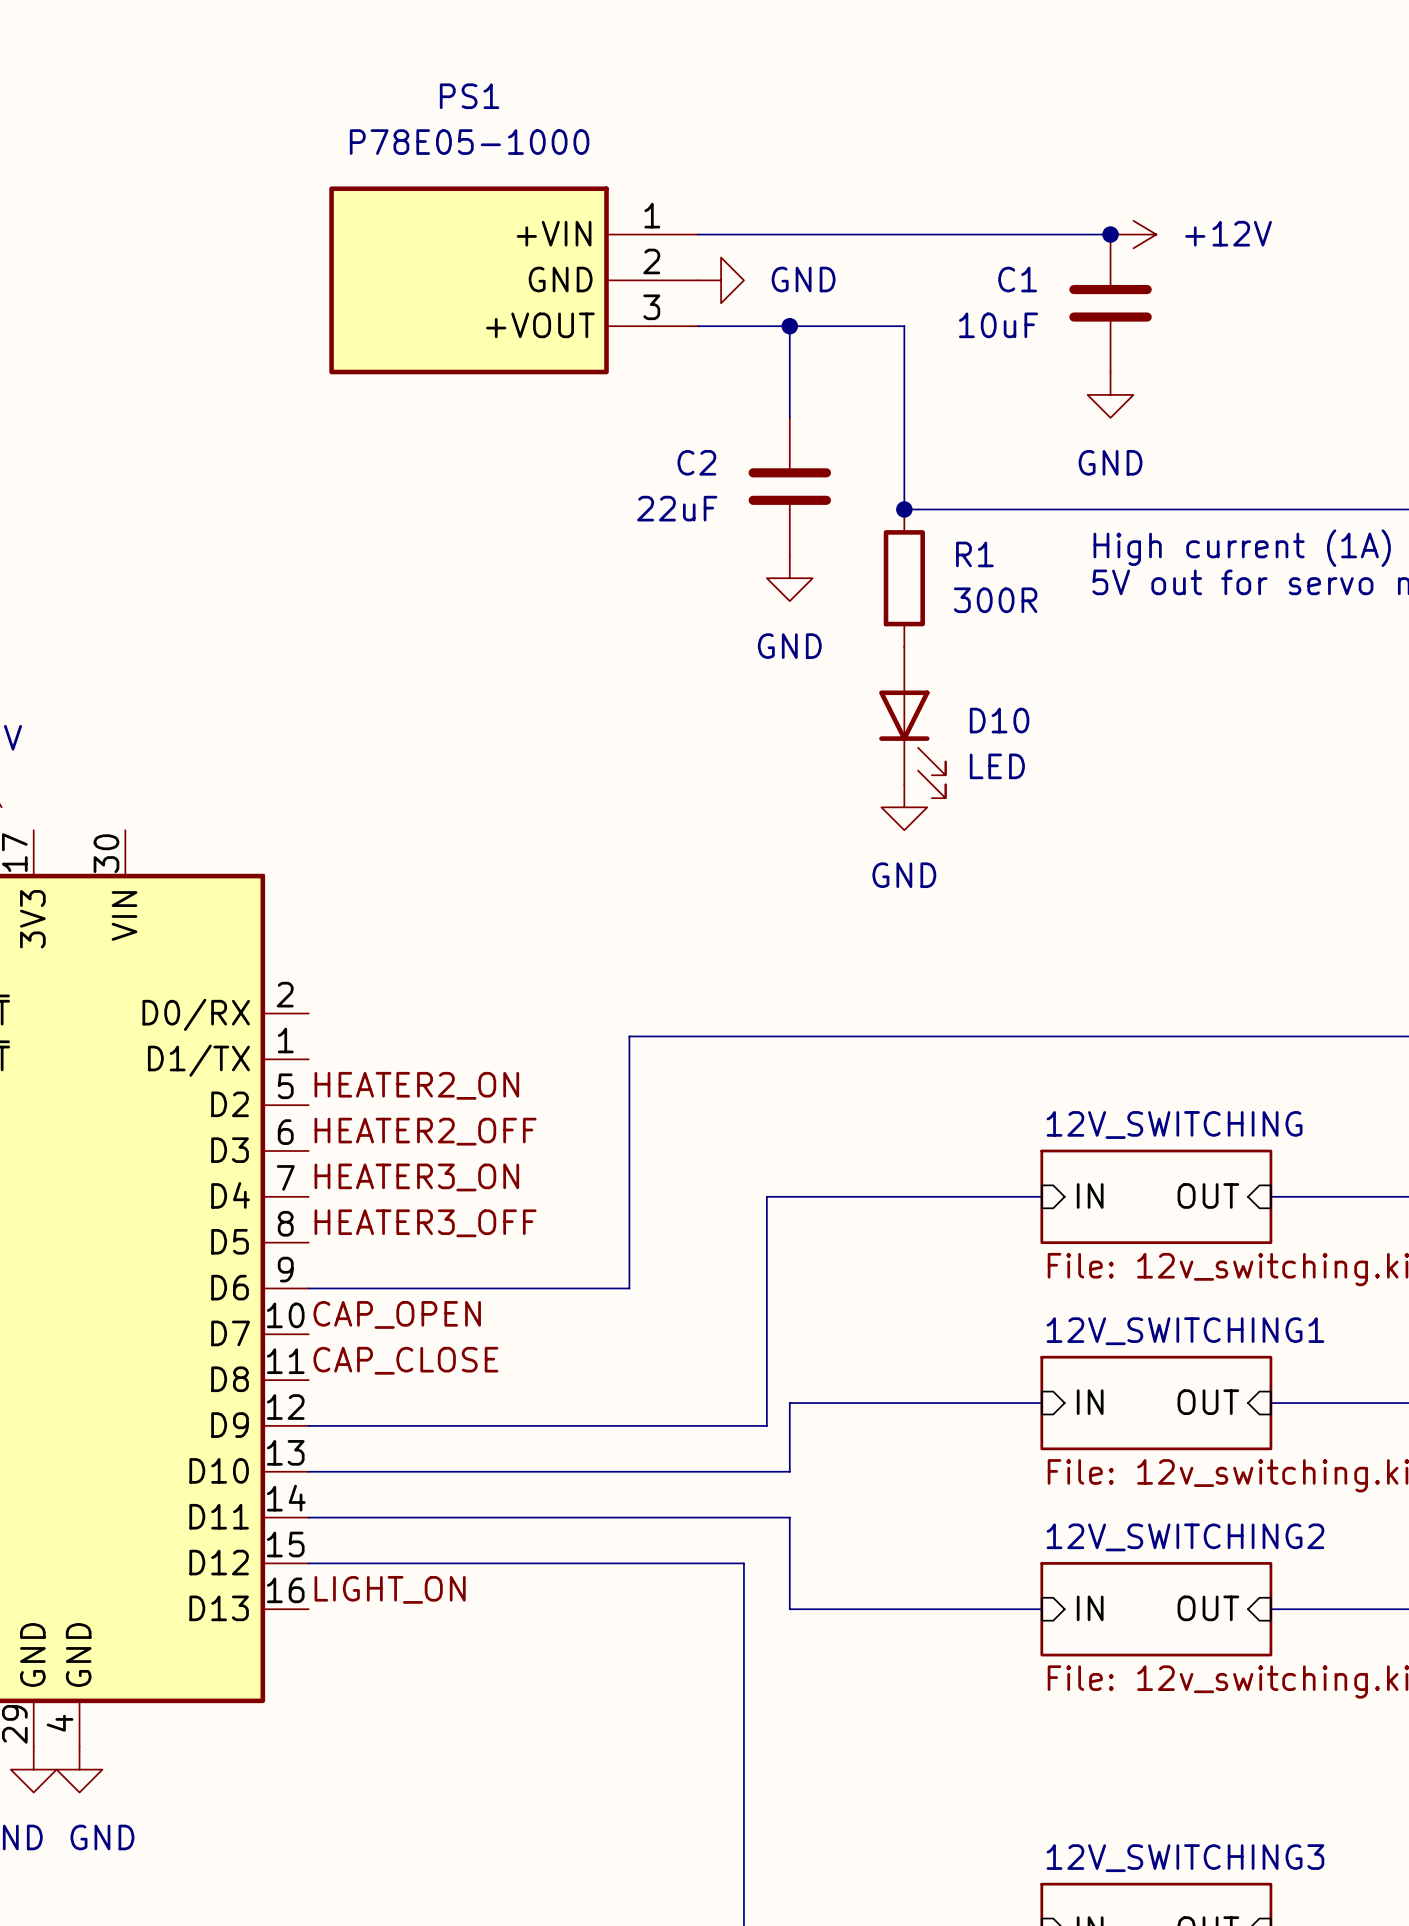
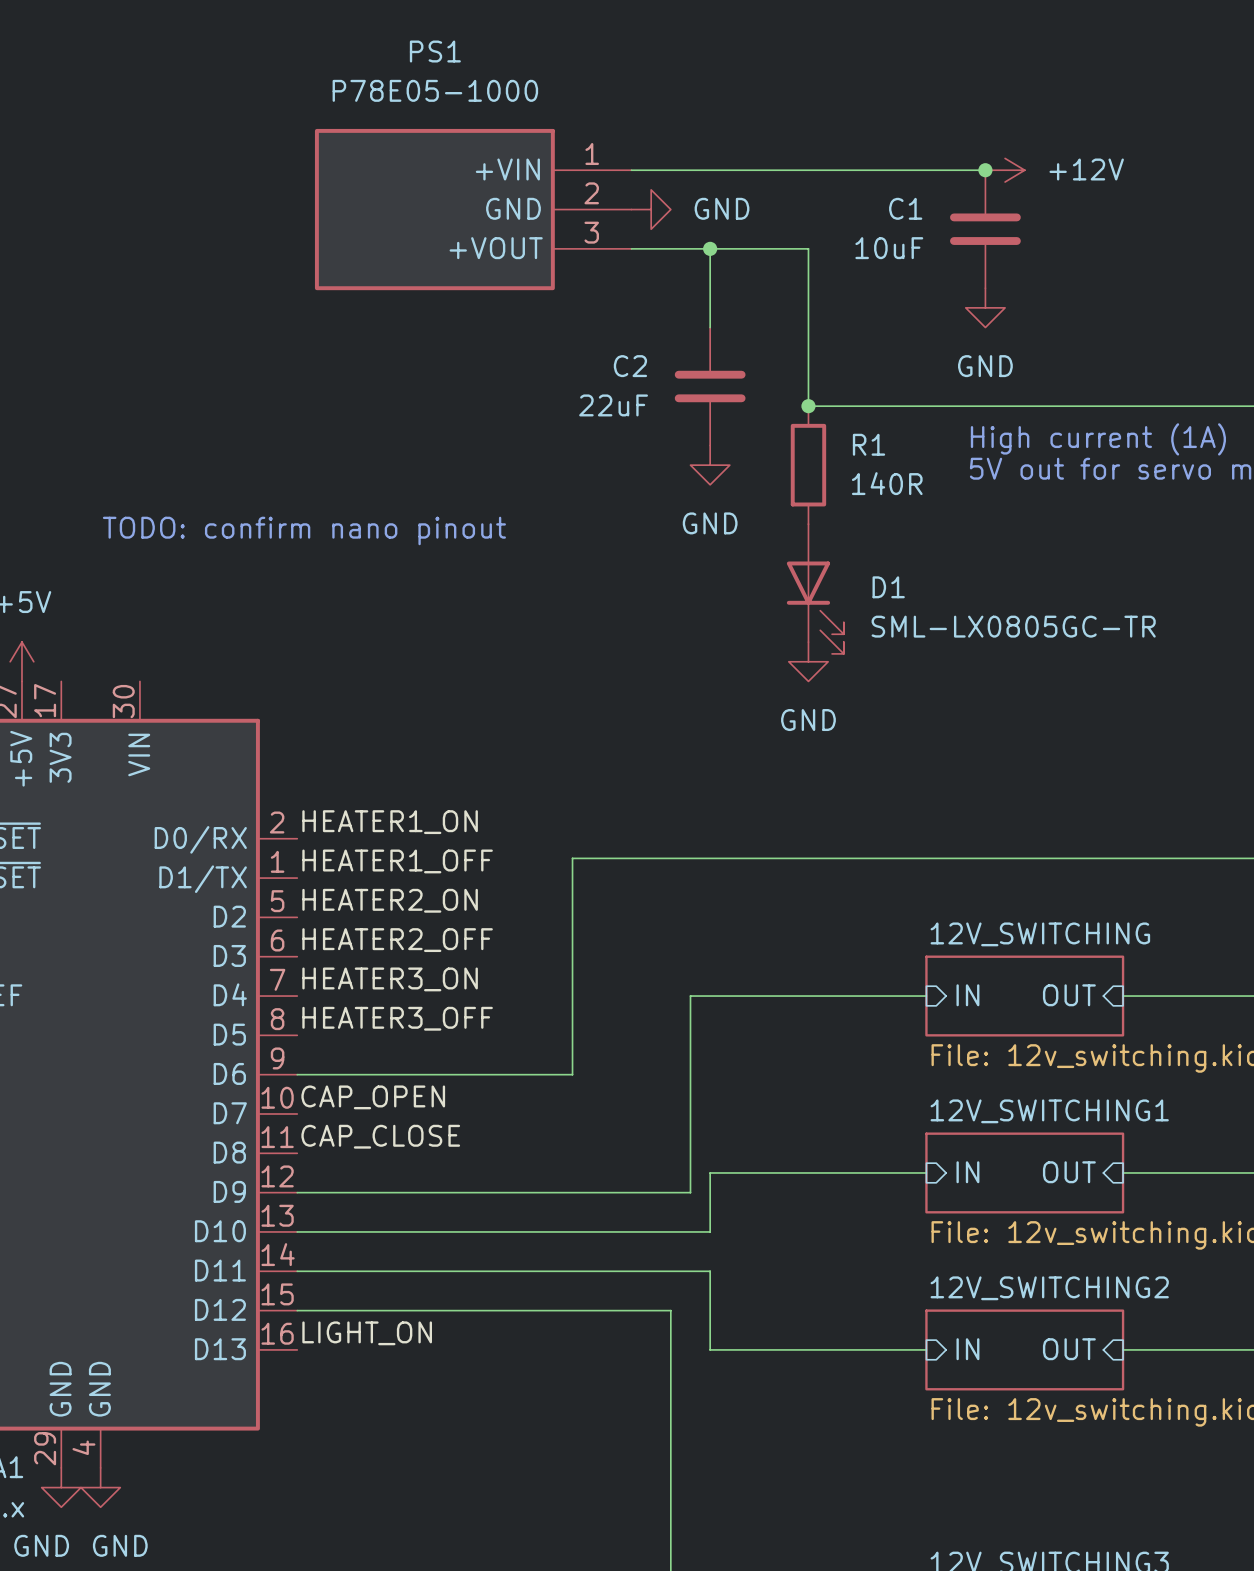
R1 value: 300R (995, 600) -> 140R (887, 483)
text: none -> TODO: confirm nano pinout (304, 530)
D10 name: D10 (999, 720) -> D1 (888, 587)
D10 value: LED (997, 766) -> SML-LX0805GC-TR (1013, 626)
label: none -> HEATER1_ON (390, 822)
label: none -> HEATER1_OFF (397, 861)

